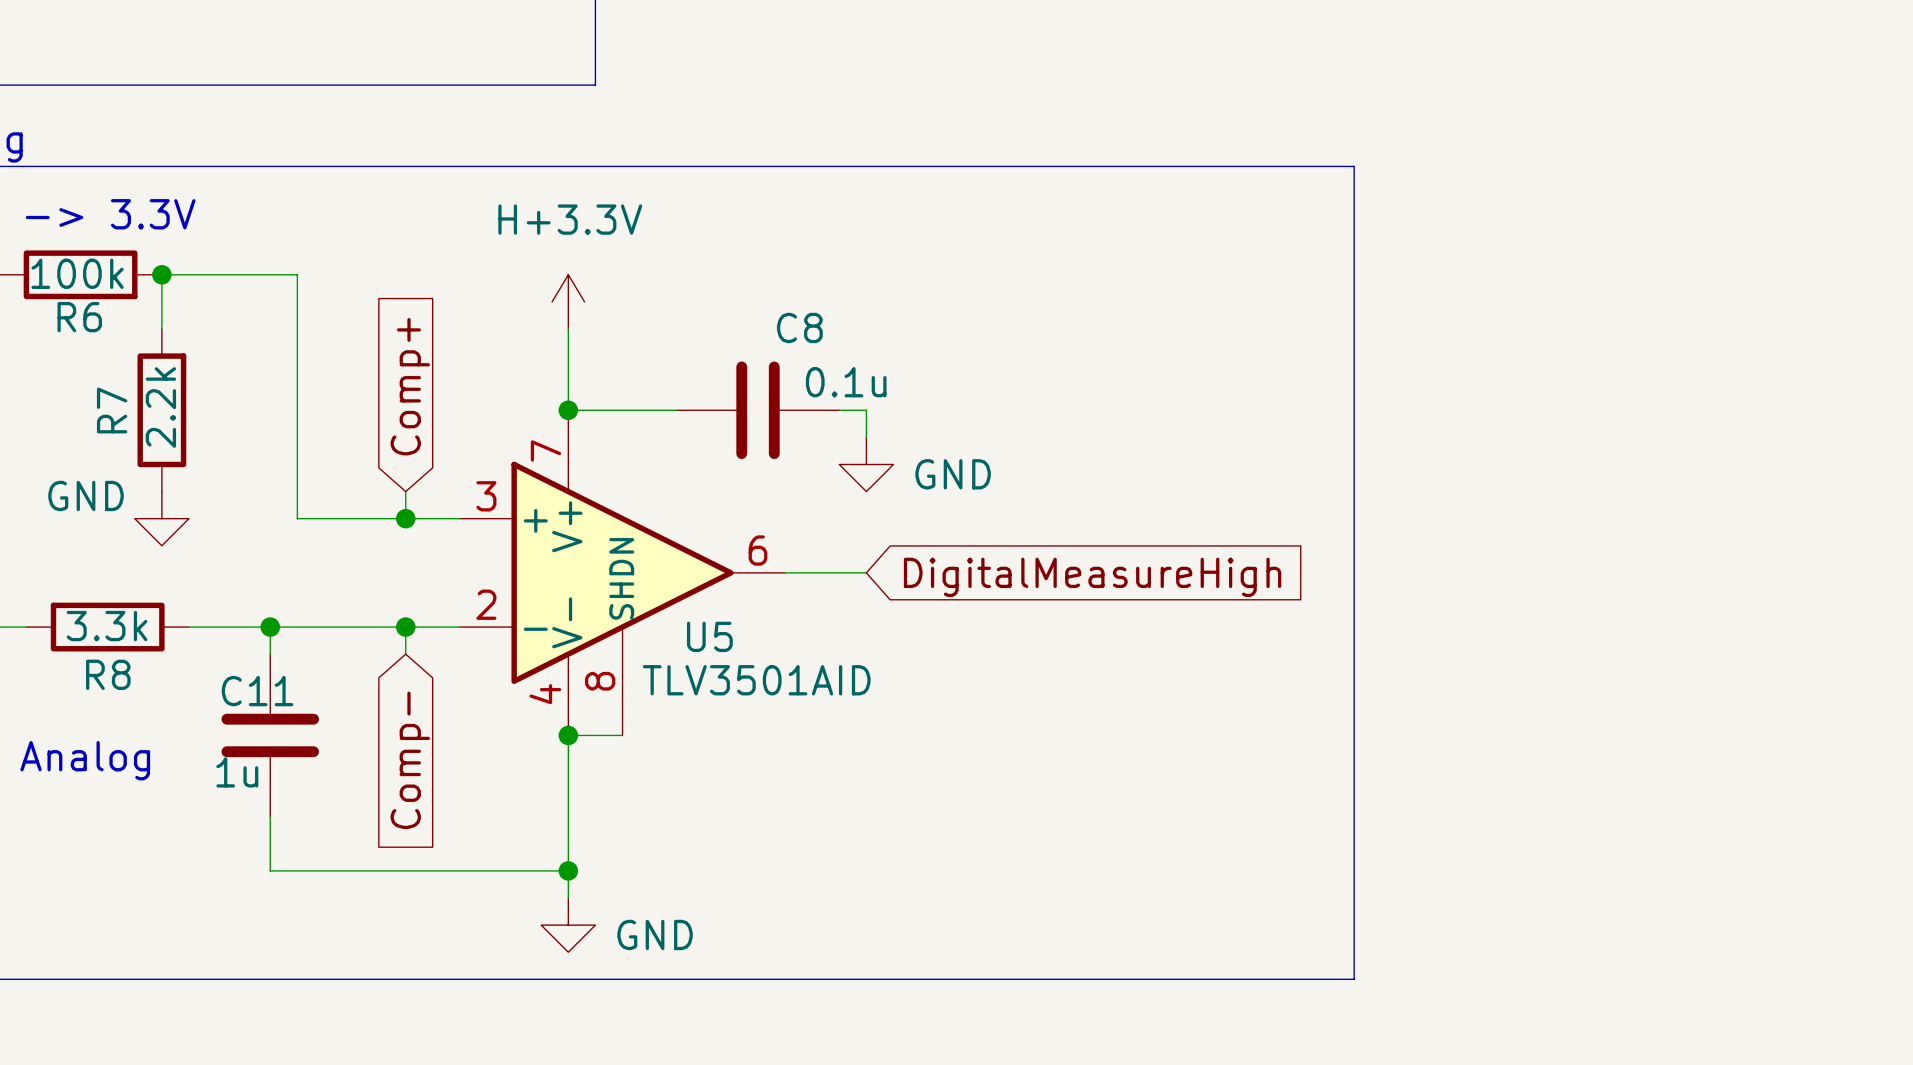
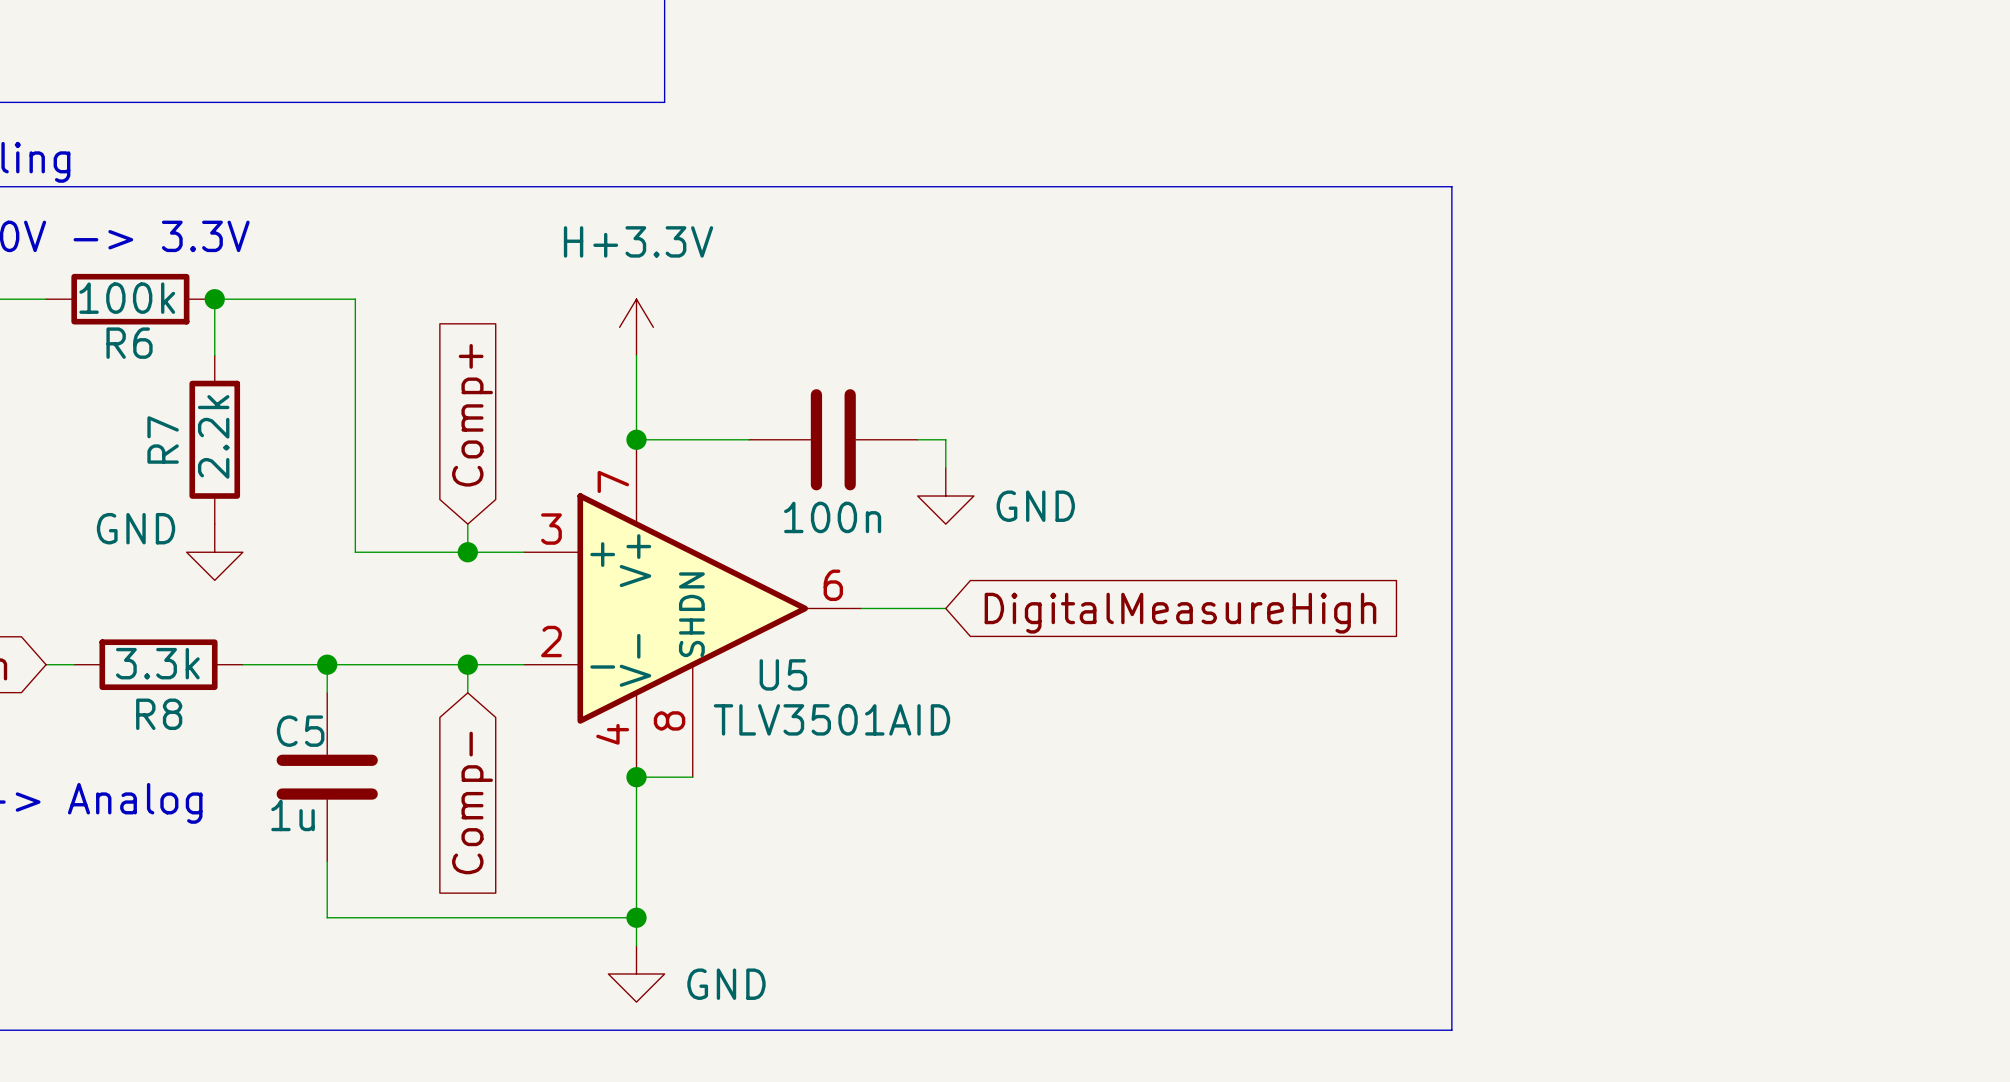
C8 name: C8 (799, 327) -> none
C8 value: 0.1u (846, 382) -> 100n (832, 517)
C11 name: C11 (257, 691) -> C5 (300, 731)

